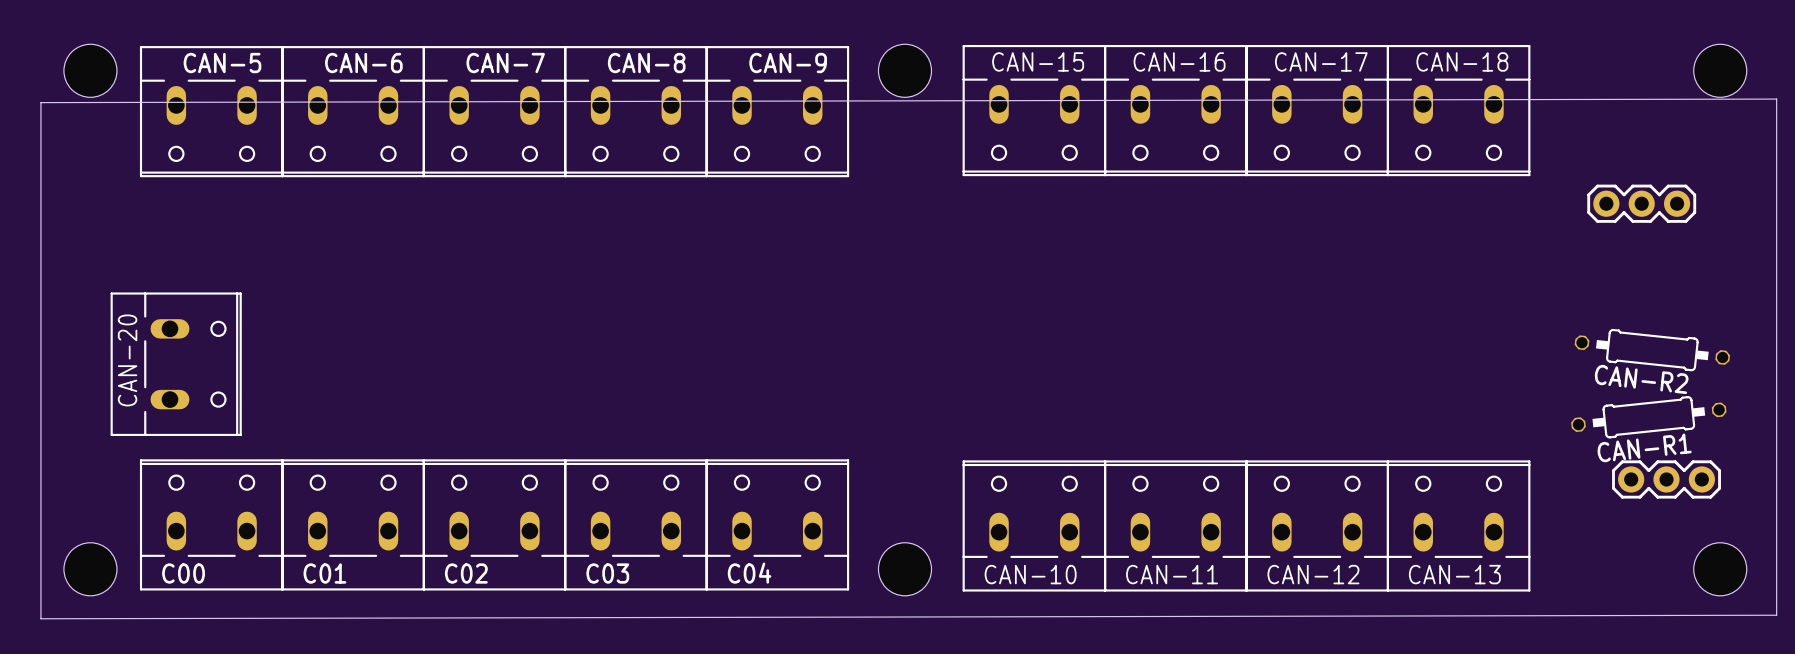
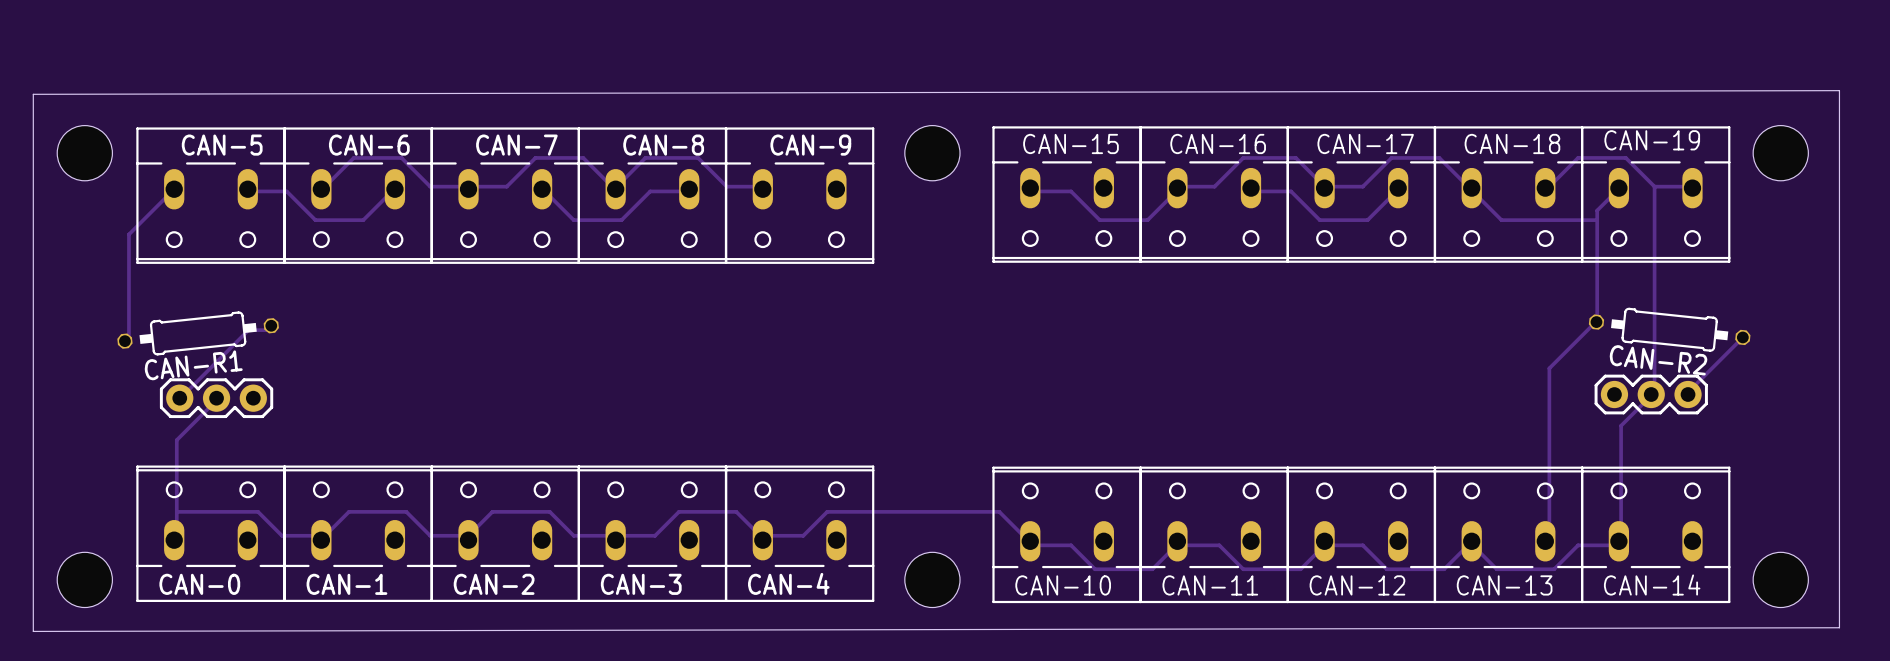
hole position: (90, 70) -> (84, 153)
hole position: (904, 70) -> (932, 153)
hole position: (1720, 70) -> (1780, 153)
CAN-15 position: (1034, 110) -> (1067, 194)
CAN-16 position: (1175, 110) -> (1214, 194)
CAN-17 position: (1317, 110) -> (1361, 194)
CAN-18 position: (1458, 110) -> (1508, 194)
CAN-5 position: (211, 111) -> (211, 195)
CAN-6 position: (353, 111) -> (358, 195)
CAN-7 position: (494, 111) -> (505, 195)
CAN-8 position: (635, 111) -> (652, 195)
CAN-9 position: (777, 111) -> (799, 195)
track: none -> (1324, 186) (1362, 186) (1391, 157) (1439, 157) (1471, 188) (1501, 220) (1597, 220)
track: none -> (1324, 186) (1295, 157) (1243, 157) (1214, 186) (1177, 188) (1147, 220) (1099, 220) (1071, 191) (1032, 191) (1030, 188)
track: none -> (1654, 186) (1692, 188)
track: none -> (1654, 186) (1625, 157) (1578, 157) (1549, 186) (1545, 188)
track: none -> (1654, 186) (1654, 392) (1621, 425) (1621, 540) (1616, 545) (1578, 545) (1554, 569) (1496, 569) (1472, 545) (1471, 541) (1444, 569) (1386, 569) (1362, 545) (1324, 545)
track: none -> (1251, 188) (1252, 191) (1291, 191) (1319, 220) (1367, 220) (1398, 188)
track: none -> (1618, 188) (1597, 210) (1597, 320) (1549, 368) (1549, 540) (1545, 541)
track: none -> (174, 189) (128, 234) (128, 339) (124, 341)
track: none -> (247, 189) (248, 191) (286, 191) (315, 220) (363, 220) (394, 189)
track: none -> (321, 189) (353, 157) (401, 157) (430, 186) (506, 186) (535, 157) (583, 157) (615, 189) (645, 157) (698, 157) (726, 186) (760, 186) (762, 189)
track: none -> (542, 189) (573, 220) (621, 220) (650, 191) (688, 191) (689, 189)
CAN-19: none -> (1655, 194)
part: (1641, 203) -> none
track: none -> (271, 325) (267, 330) (248, 330) (179, 398)
track: none -> (1742, 337) (1688, 392) (1688, 394)
CAN-R2 position: (1652, 350) -> (1669, 329)
CAN-20: (176, 364) -> none
part: none -> (1651, 394)
track: none -> (216, 398) (176, 440) (176, 535) (174, 540)
part: none -> (216, 398)
CAN-R1 position: (1648, 417) -> (198, 333)
part: (1666, 479) -> none
track: none -> (176, 511) (258, 511) (282, 535) (320, 535) (321, 540) (348, 511) (406, 511) (430, 535) (468, 535)
CAN-14: none -> (1655, 534)
track: none -> (468, 535) (492, 511) (549, 511) (573, 535) (611, 535) (615, 540) (616, 535) (655, 535) (678, 511) (736, 511) (762, 540) (765, 535) (803, 535) (827, 511) (999, 511) (1032, 545) (1071, 545) (1095, 569) (1152, 569) (1176, 545) (1177, 541) (1181, 545) (1219, 545) (1243, 569) (1300, 569) (1324, 545)
C00 name: C00 (183, 573) -> CAN-0 (199, 584)
C01 name: C01 (324, 573) -> CAN-1 (346, 584)
C02 name: C02 (466, 573) -> CAN-2 (494, 584)
C03 name: C03 (607, 573) -> CAN-3 (641, 584)
C04 name: C04 (749, 573) -> CAN-4 (788, 583)

